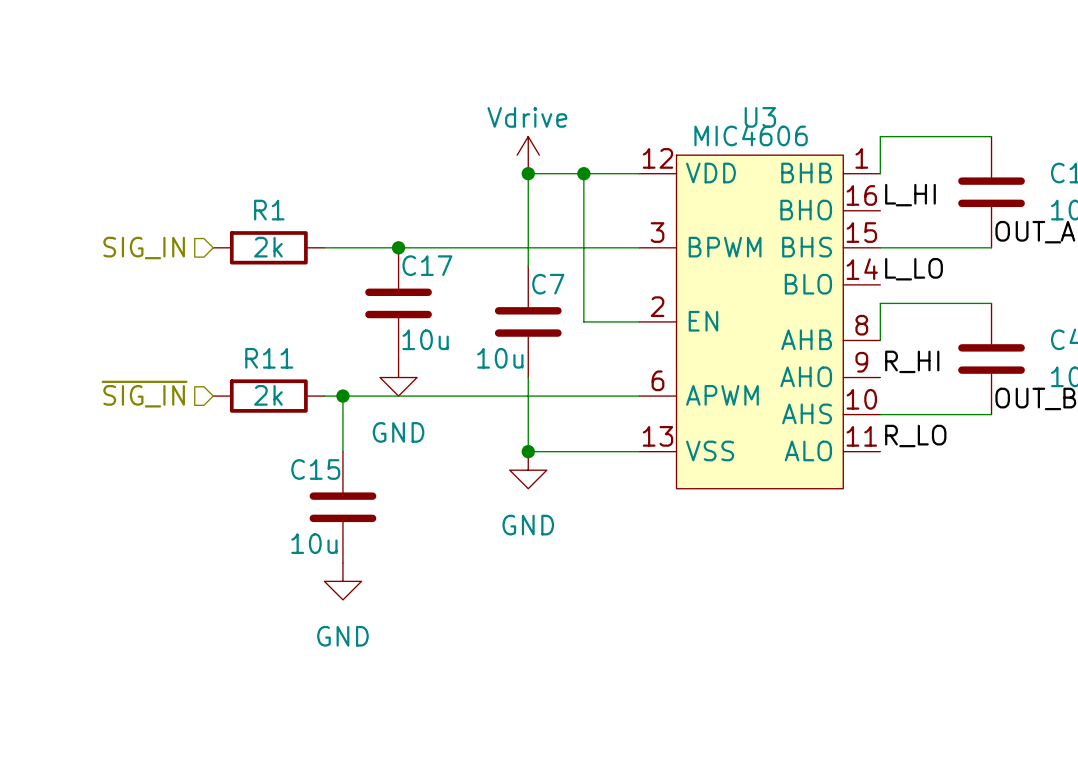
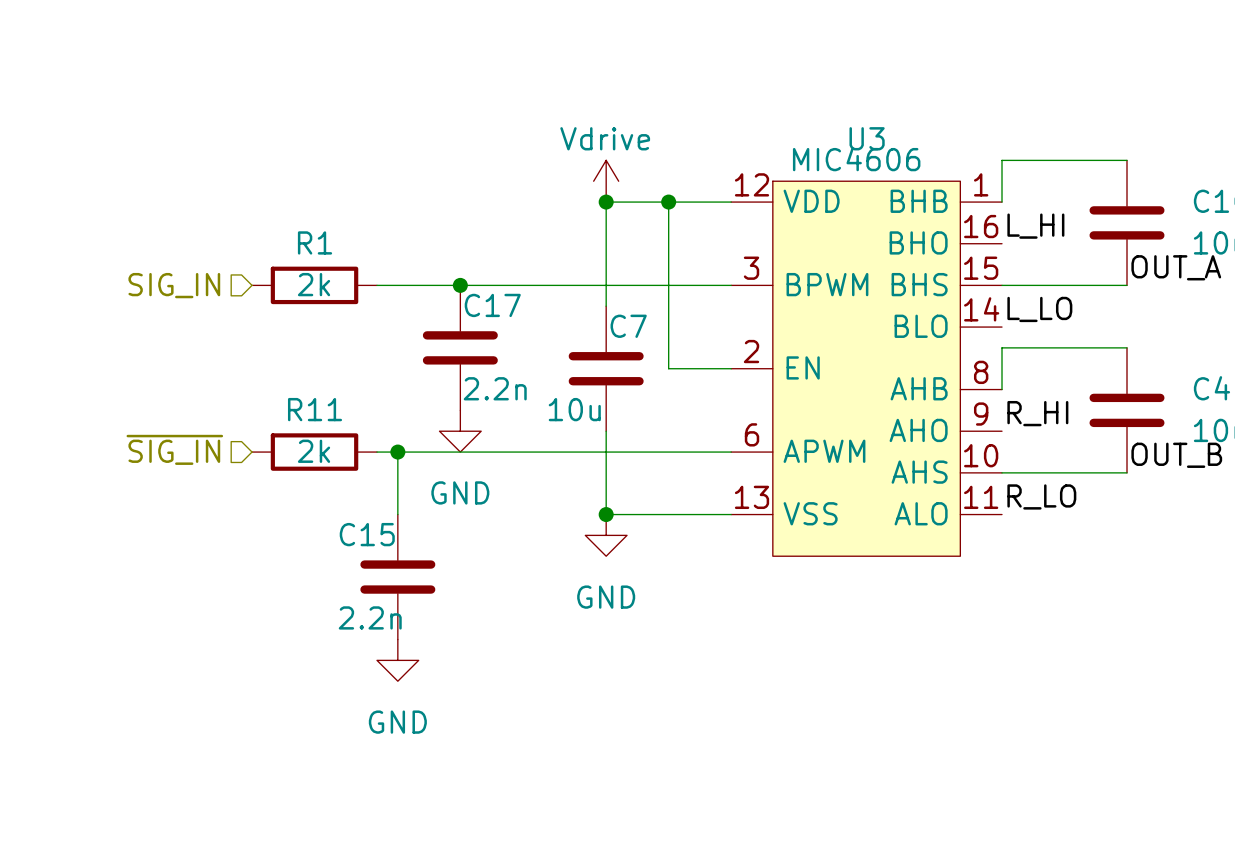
C17 value: 10u (425, 339) -> 2.2n (495, 388)
C15 value: 10u (314, 543) -> 2.2n (370, 617)

